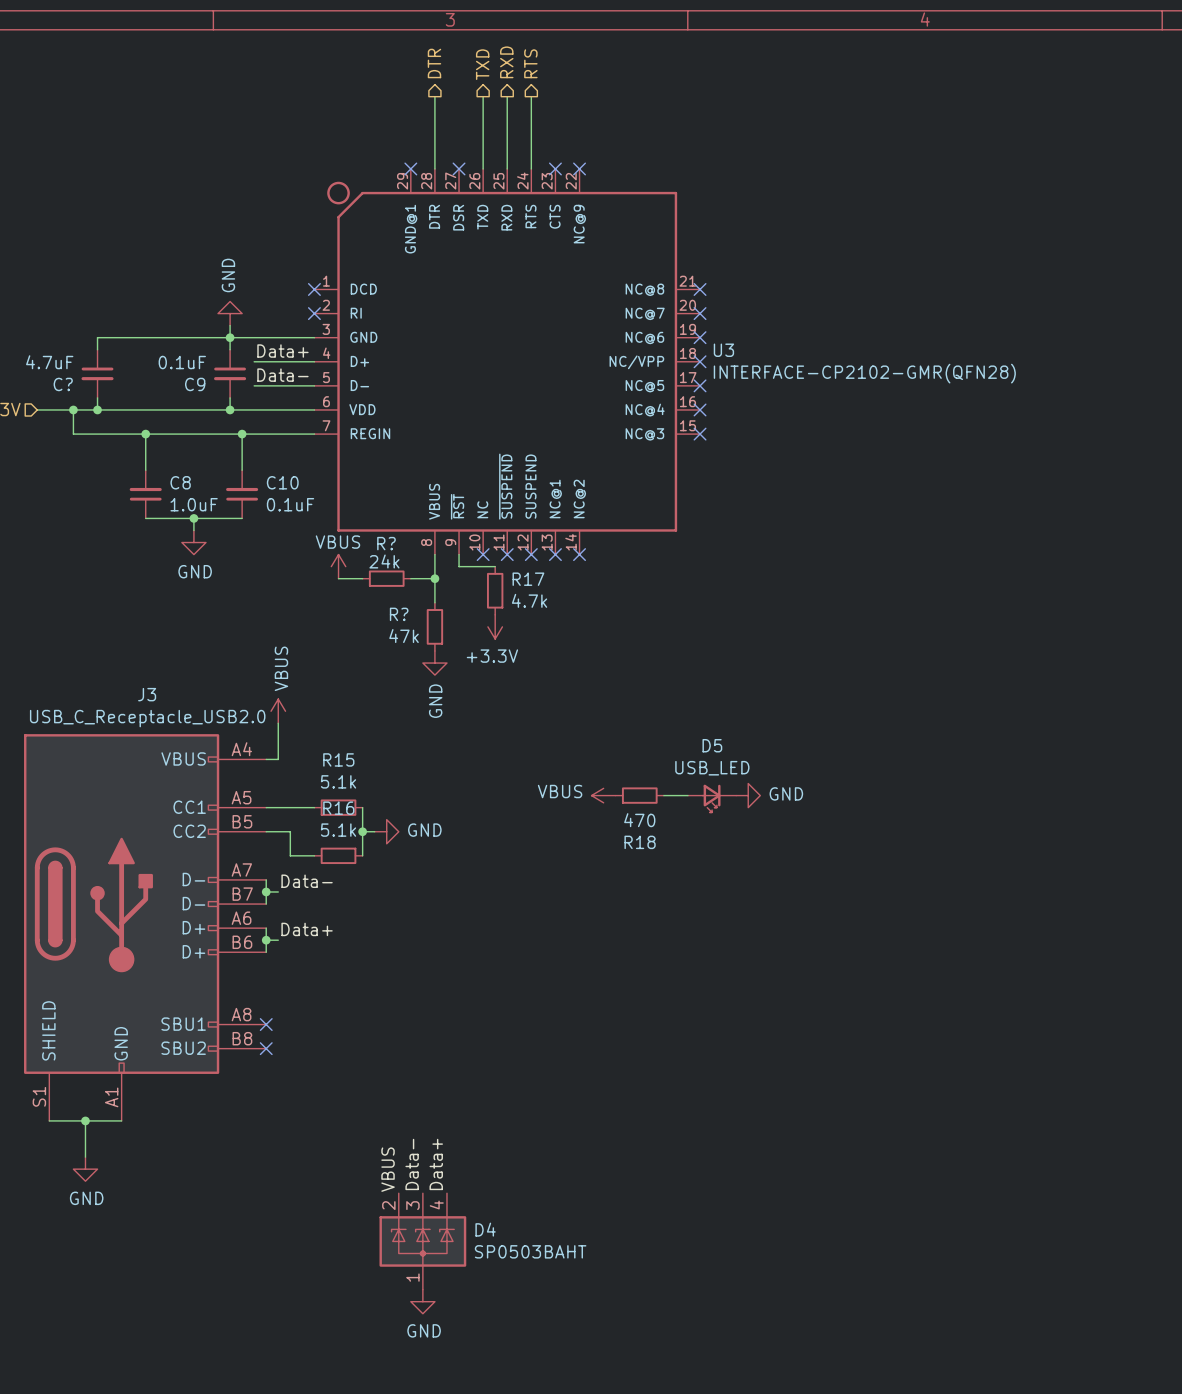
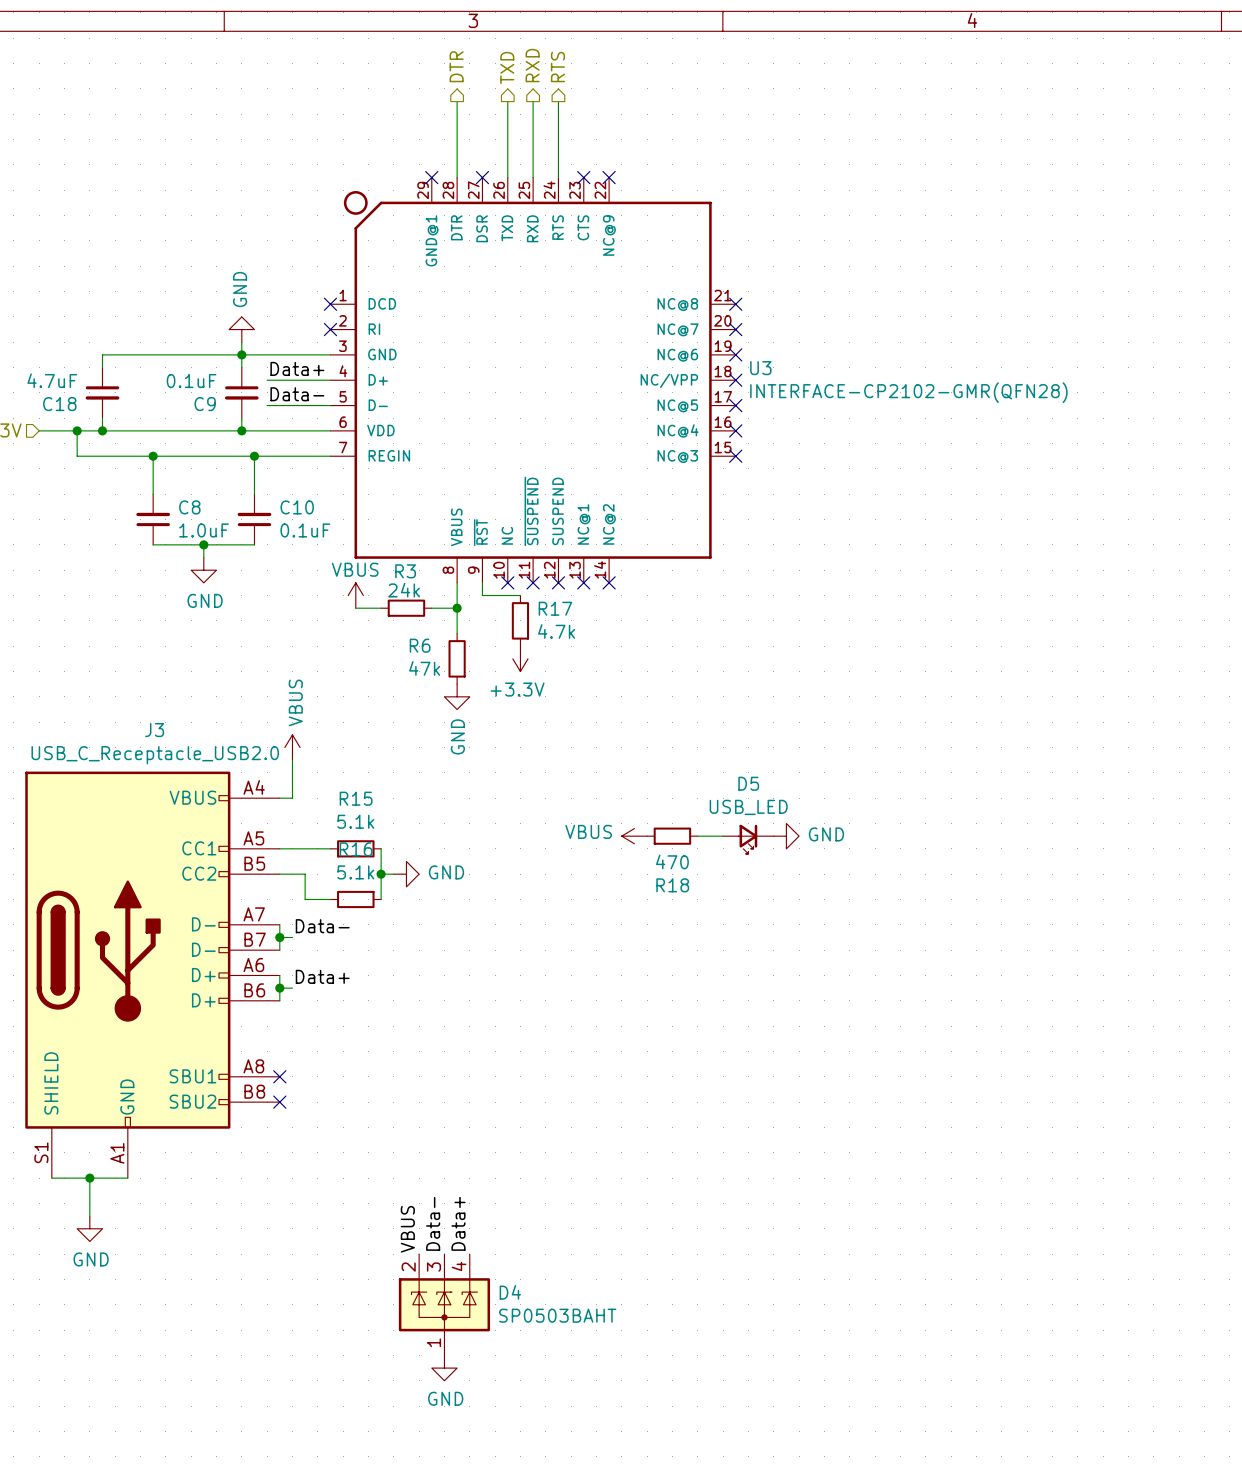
C? name: C? (63, 384) -> C18 (59, 404)
R? name: R? (386, 543) -> R3 (405, 571)
R? name: R? (399, 614) -> R6 (420, 645)

